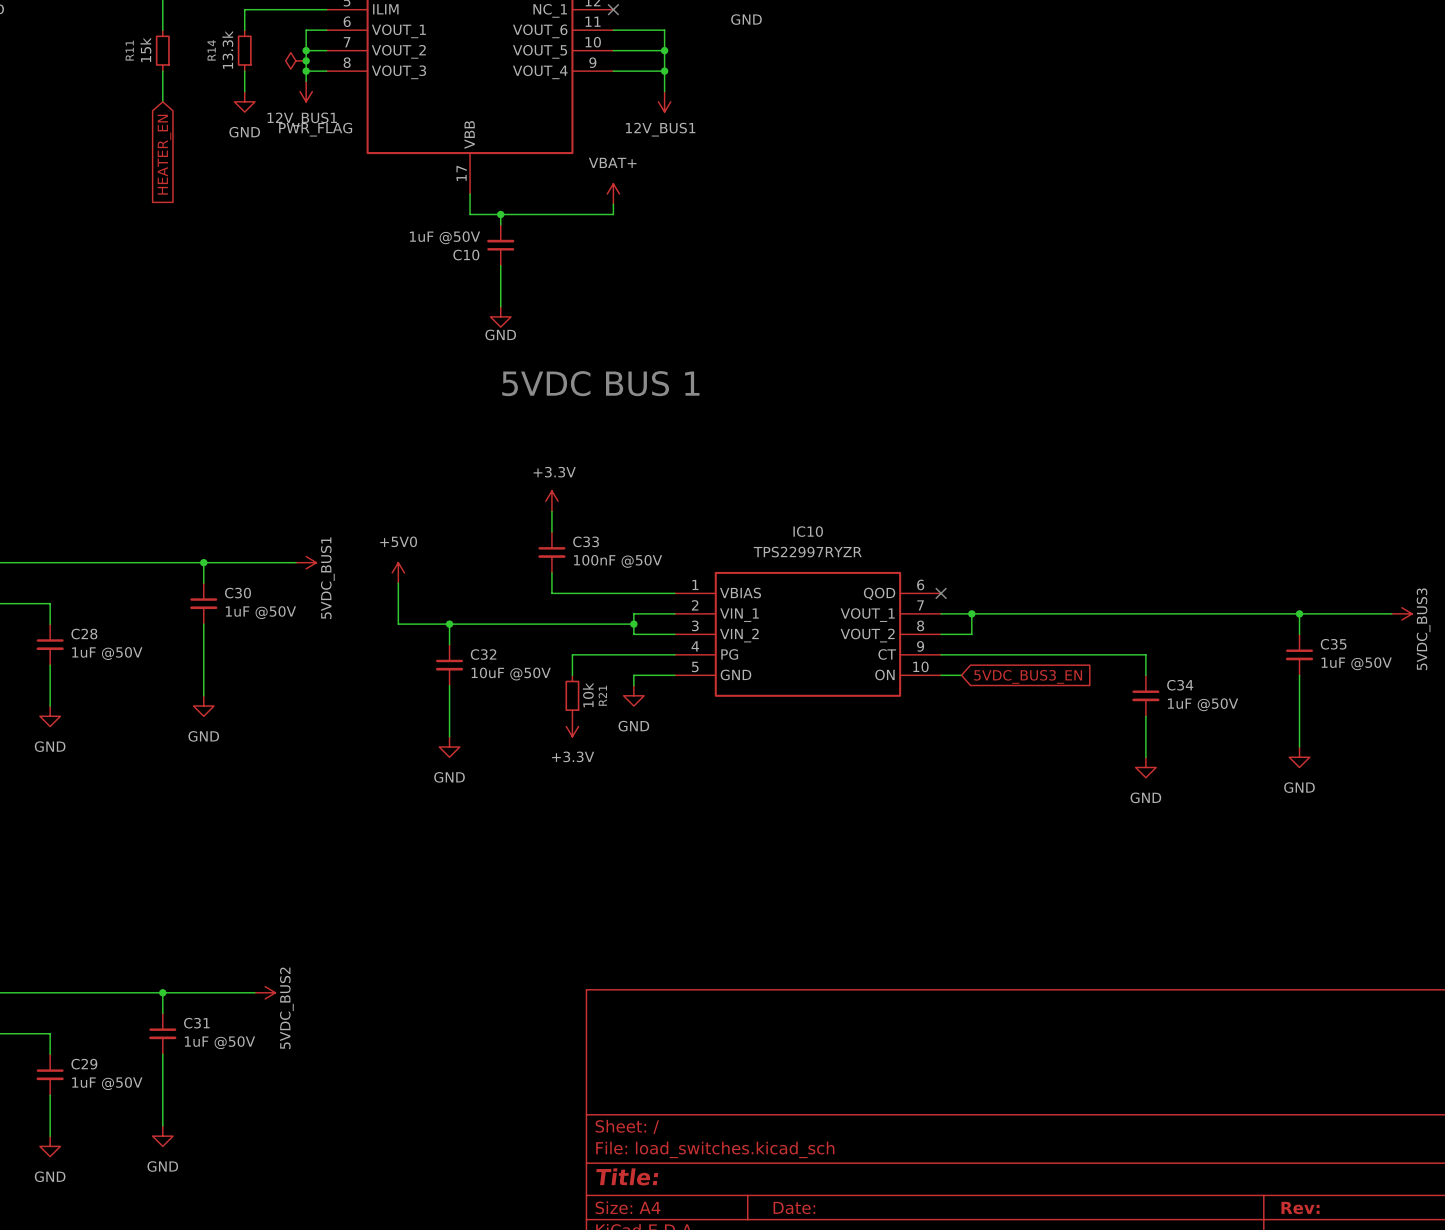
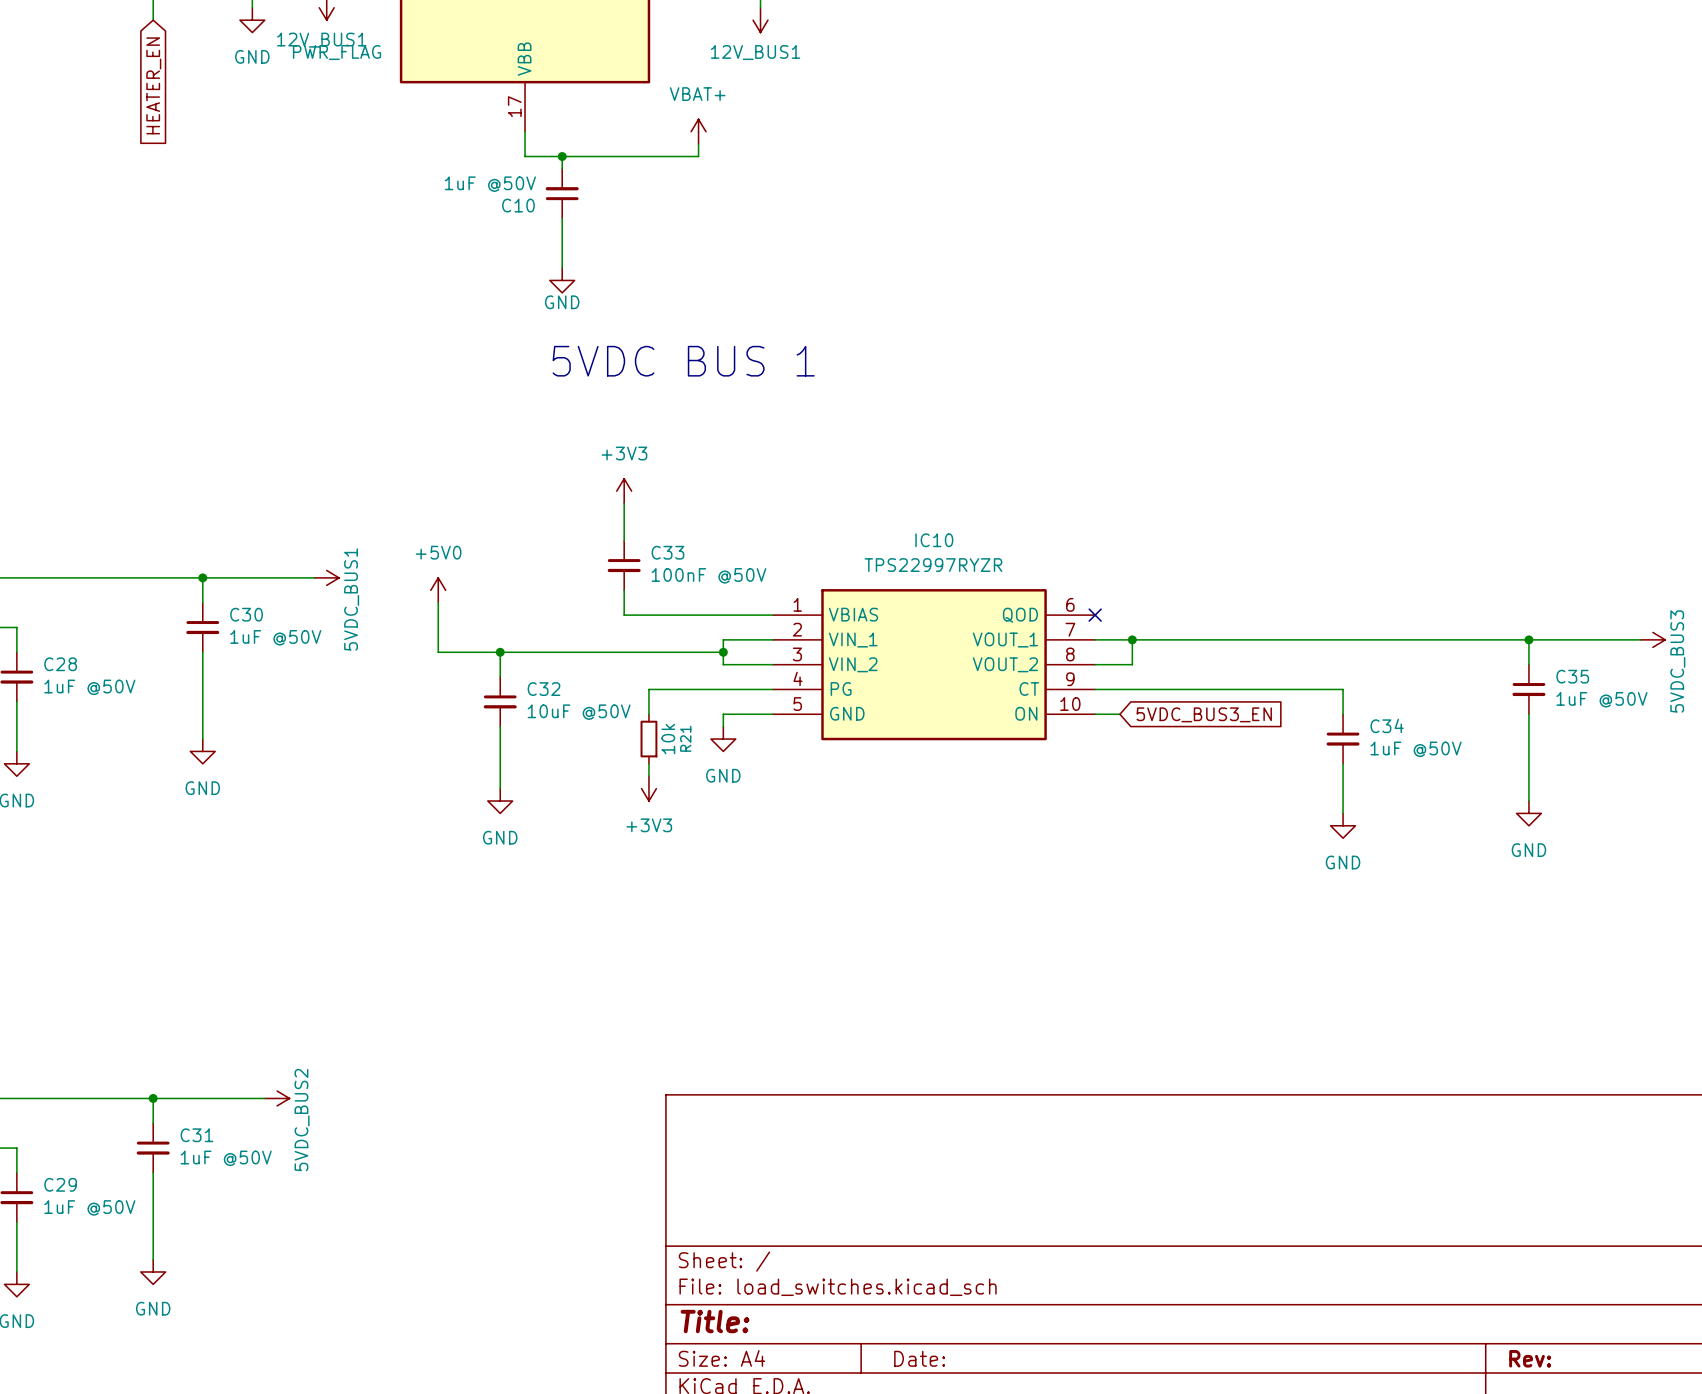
power symbol: none -> +3V3 (624, 491)
power symbol: +3.3V (551, 501) -> none
power symbol: +3.3V (572, 726) -> none
power symbol: none -> +3V3 (648, 788)

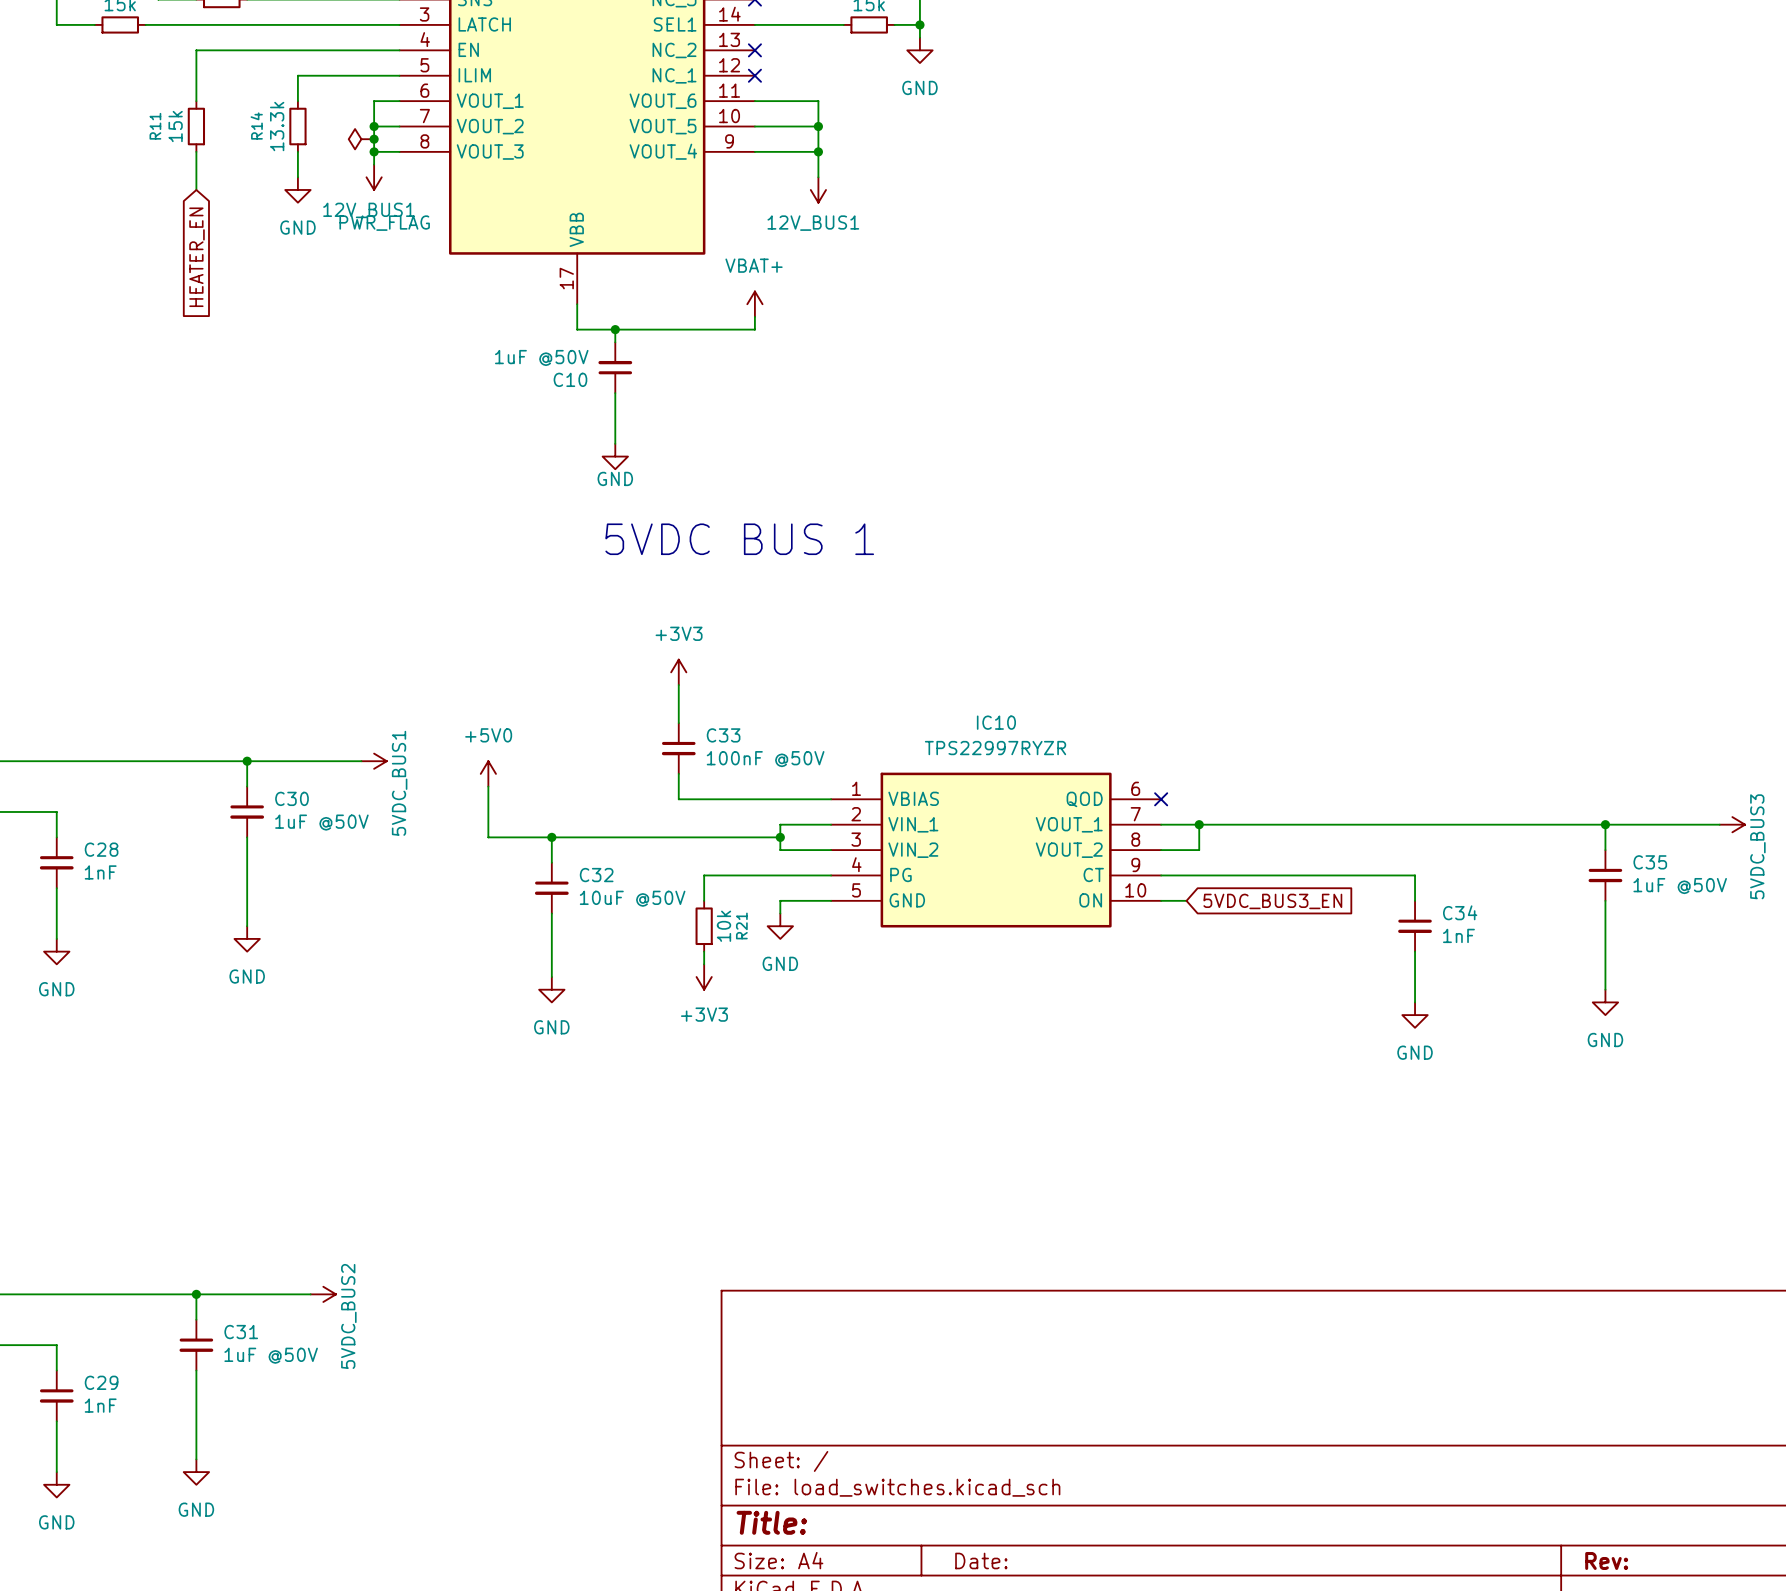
C28 value: 1uF @50V (89, 687) -> 1nF (100, 872)
C34 value: 1uF @50V (1416, 749) -> 1nF (1458, 935)
C29 value: 1uF @50V (89, 1207) -> 1nF (100, 1405)

